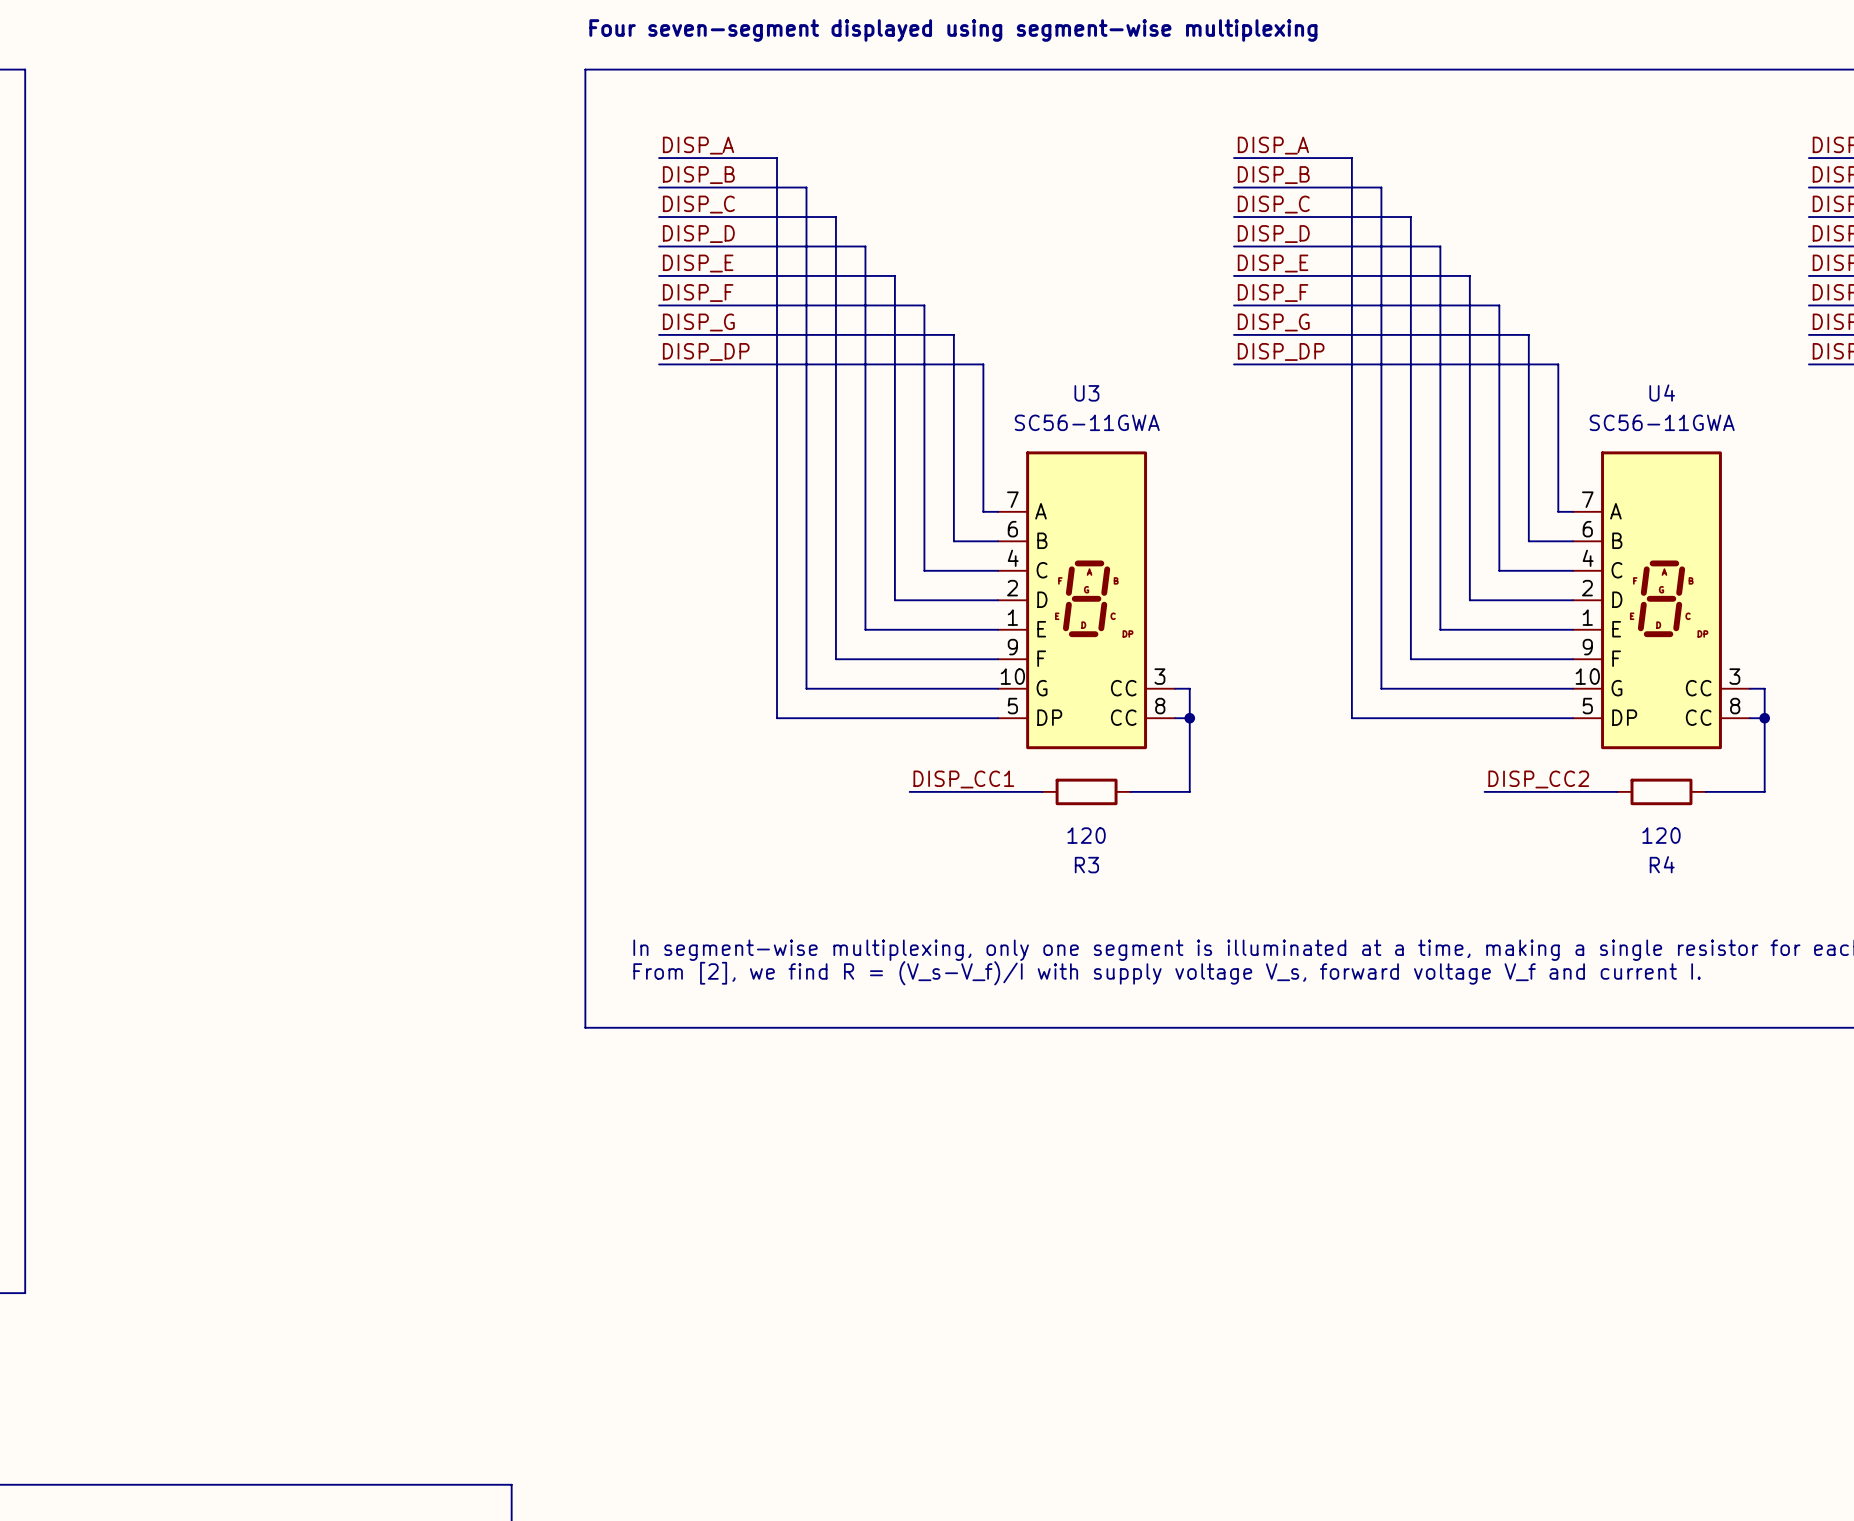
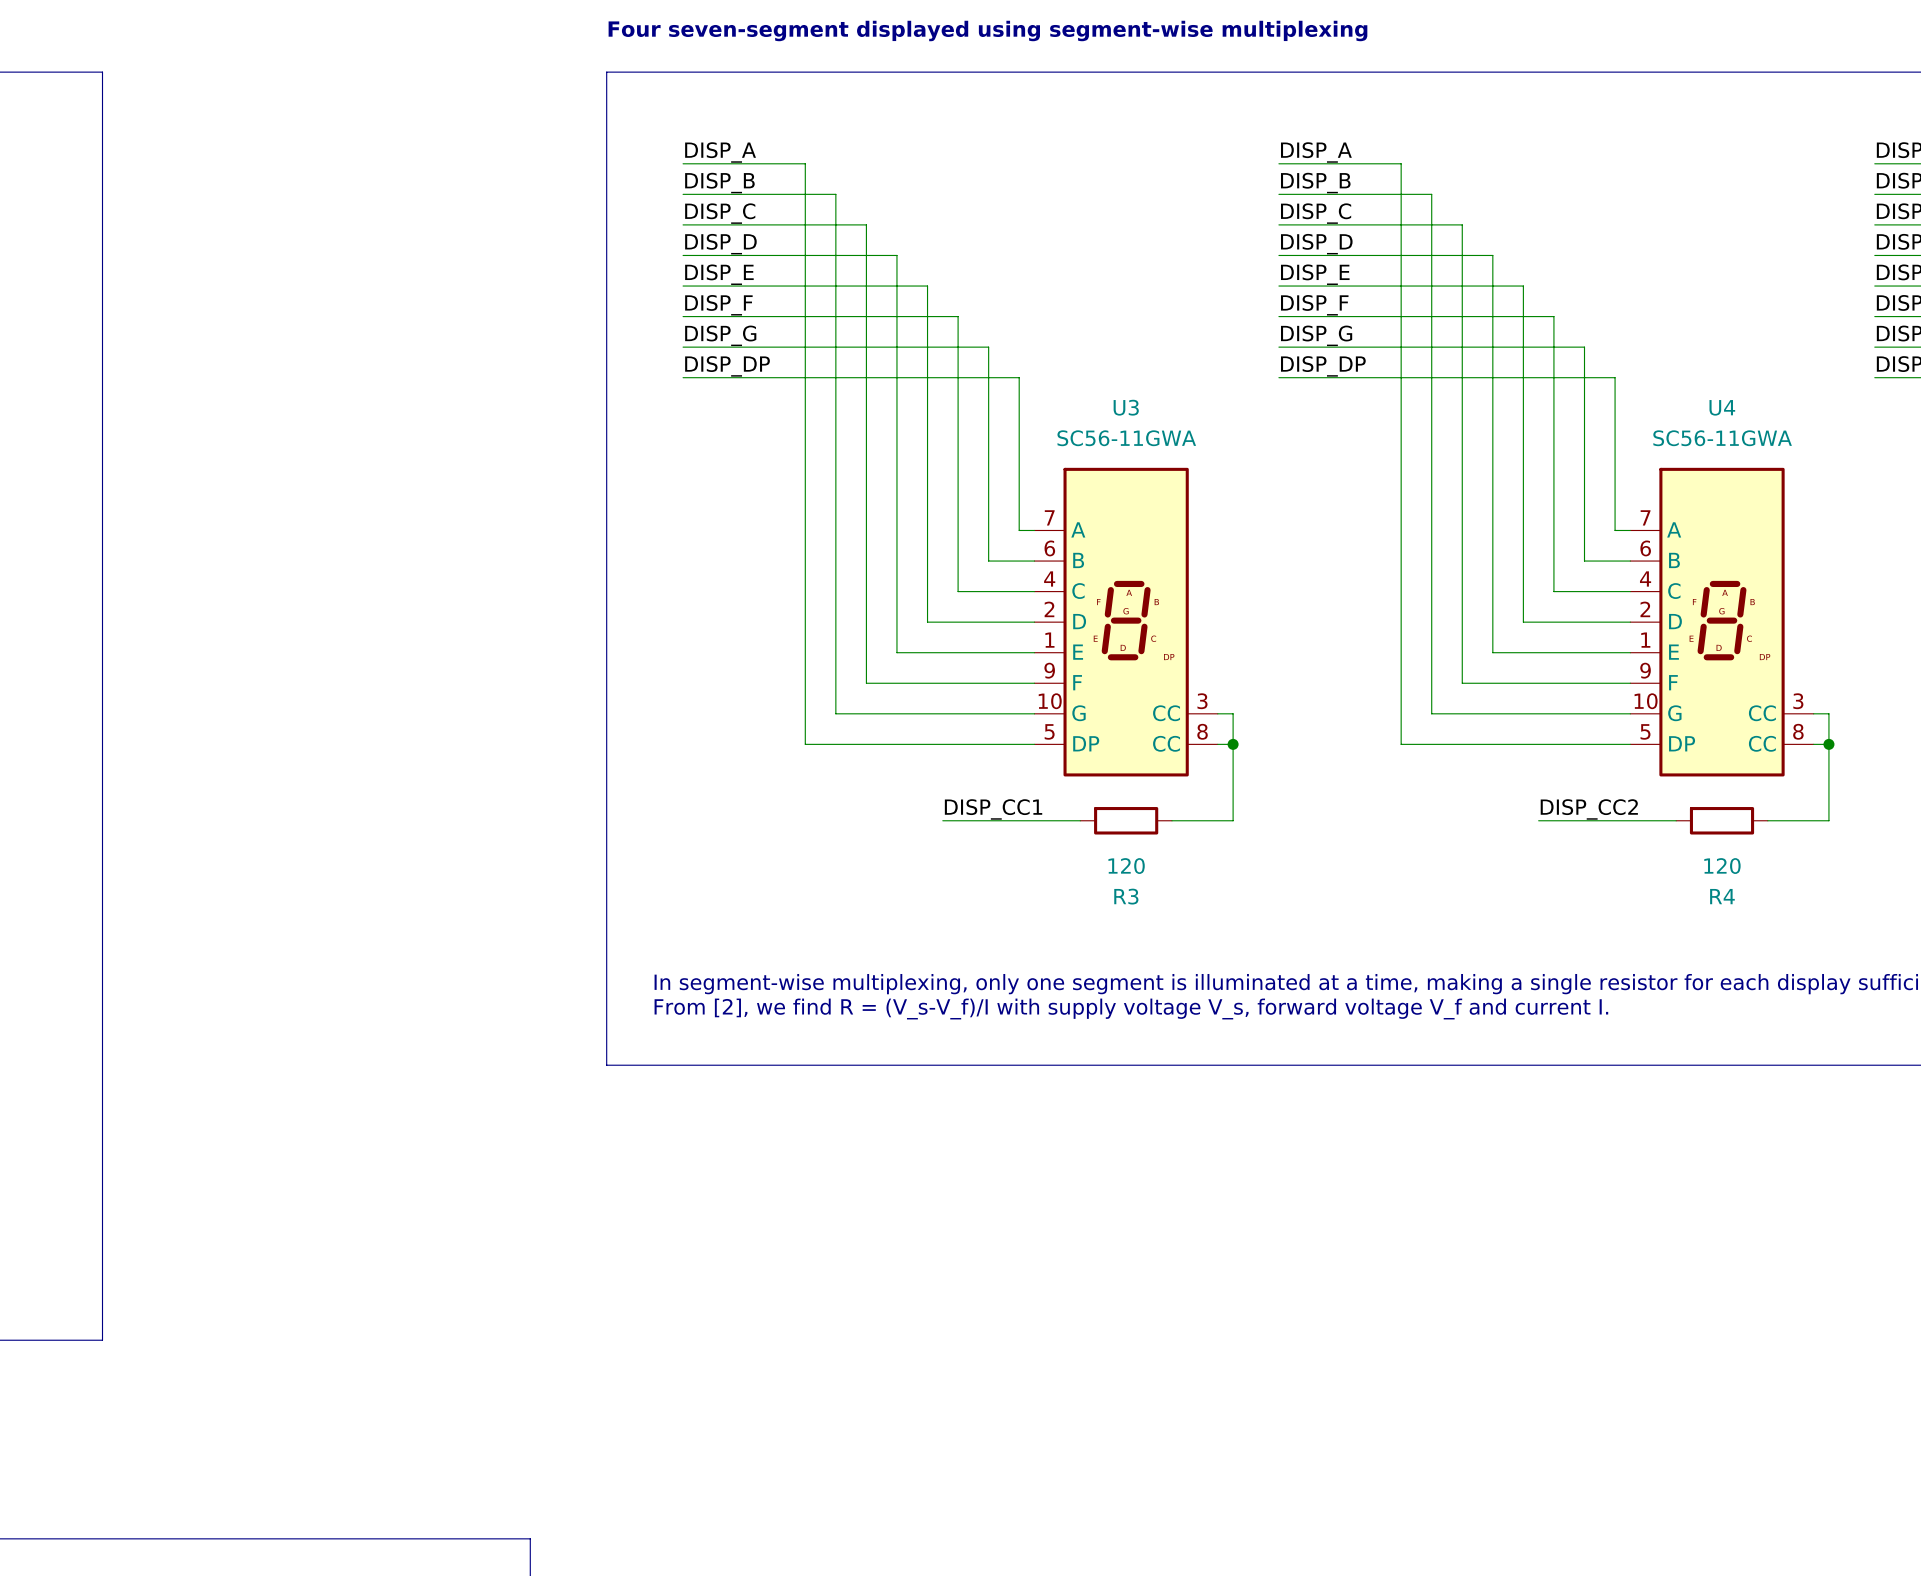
line: (25, 69) (25, 1293) -> (26, 72) (102, 72) (102, 1340) (26, 1340)

